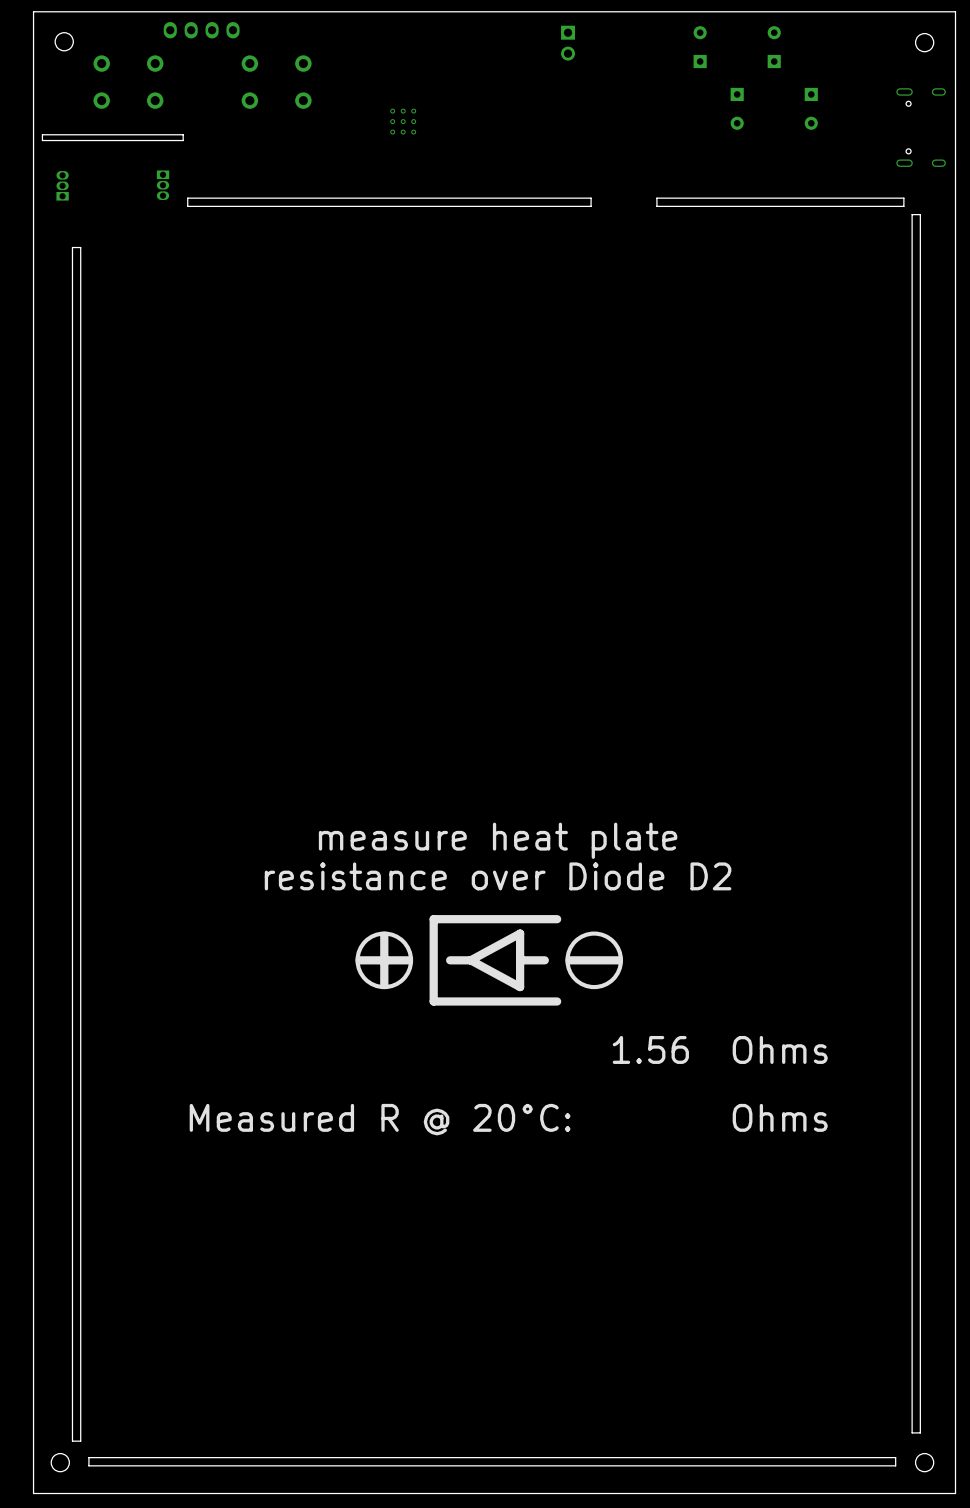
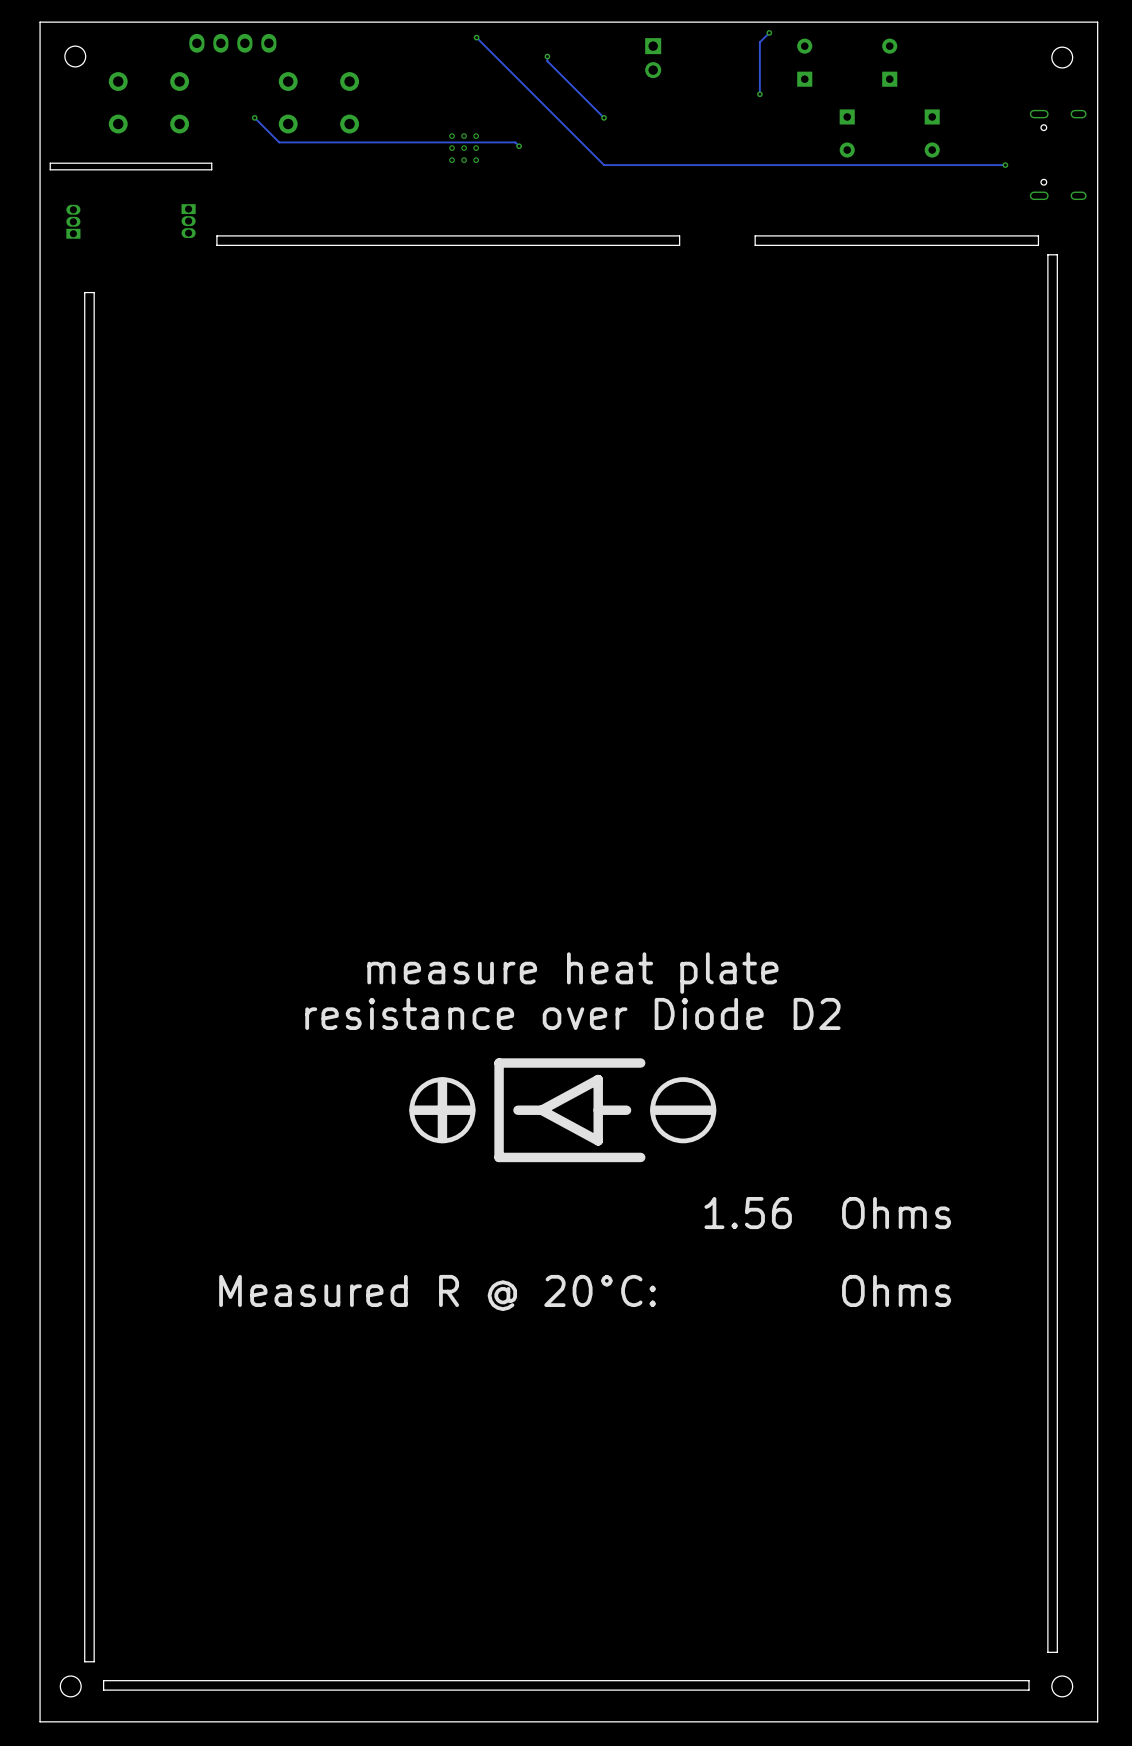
track: none -> (769, 32) (759, 42) (759, 94)
via: none -> (769, 32)
track: none -> (476, 37) (604, 165) (1005, 165)
via: none -> (476, 37)
track: none -> (547, 56) (547, 61) (604, 117)
via: none -> (547, 56)
via: none -> (759, 94)
track: none -> (254, 117) (279, 142) (515, 142) (519, 146)
via: none -> (254, 117)
via: none -> (604, 117)
via: none -> (519, 146)
via: none -> (1005, 165)

